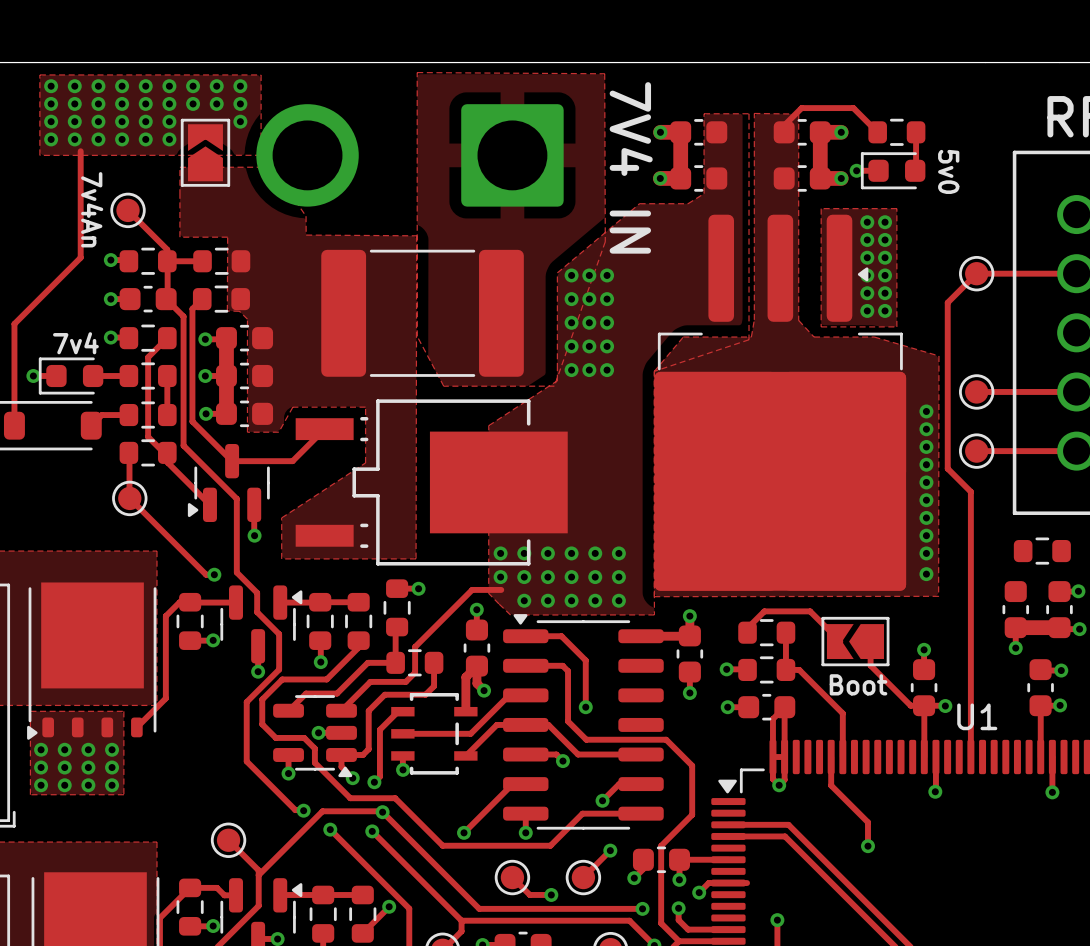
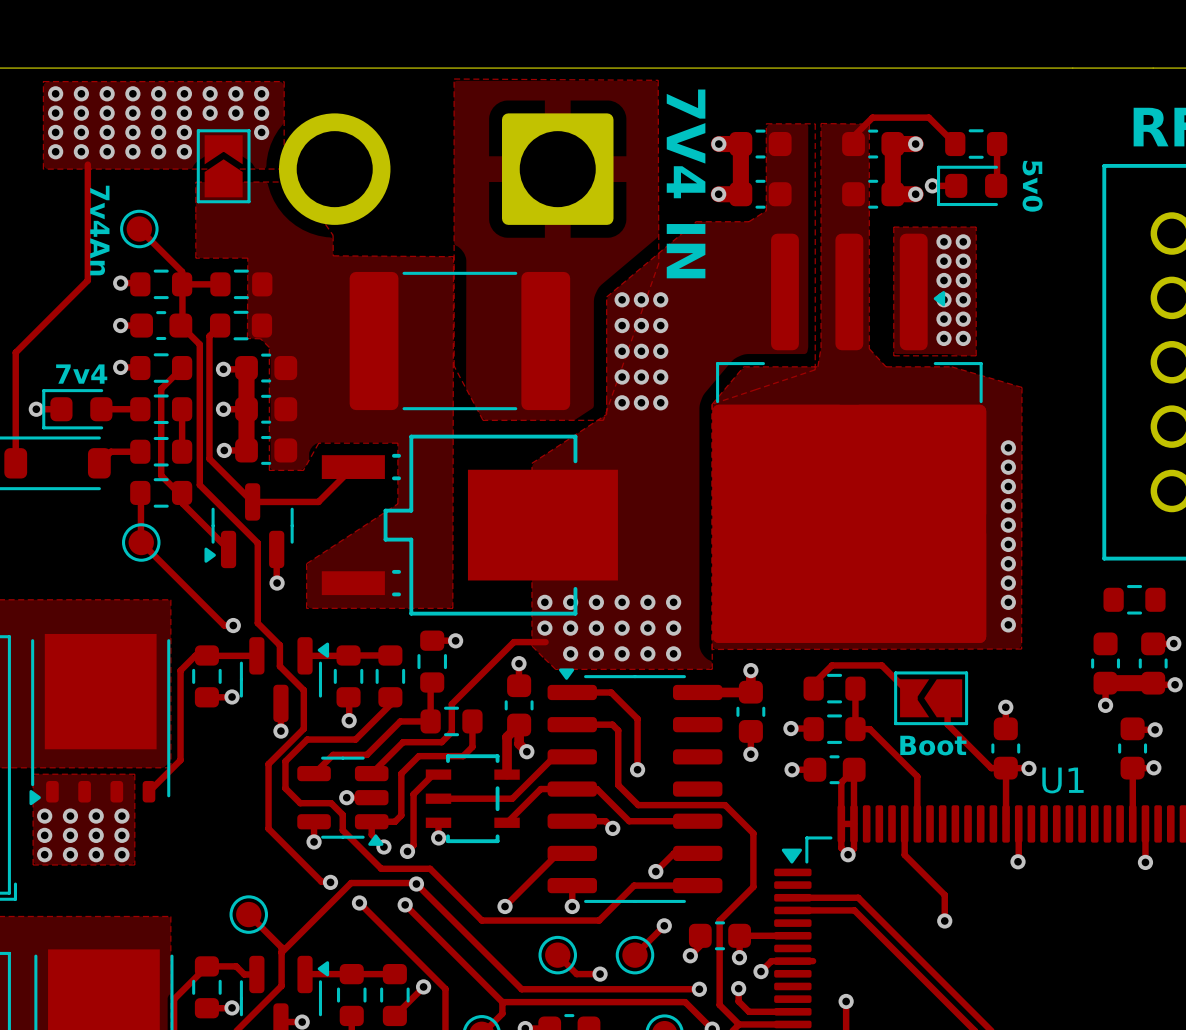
part: (976, 273) -> none
track: (1076, 273) (976, 273) (947, 302) (947, 468) (970, 491) (970, 757) -> none
track: (976, 391) (1076, 391) -> none
part: (976, 391) -> none
track: (976, 451) (1076, 451) -> none
part: (976, 451) -> none

